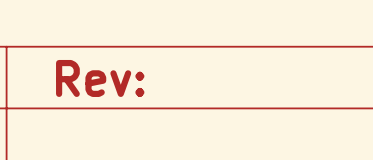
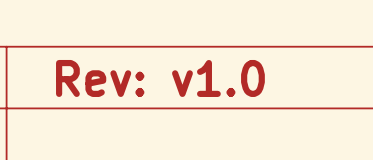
title block: Rev: (100, 78) -> Rev: v1.0 (160, 78)

